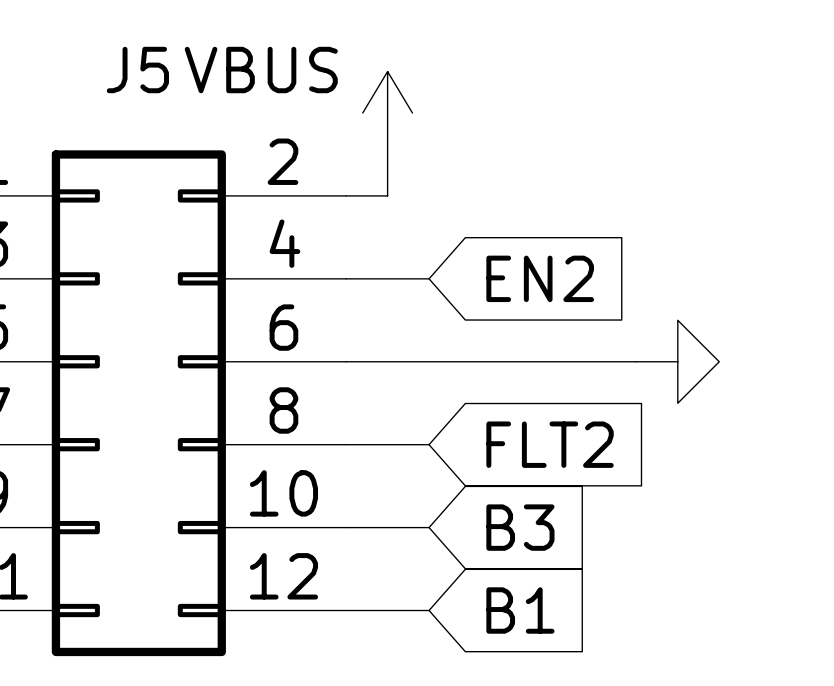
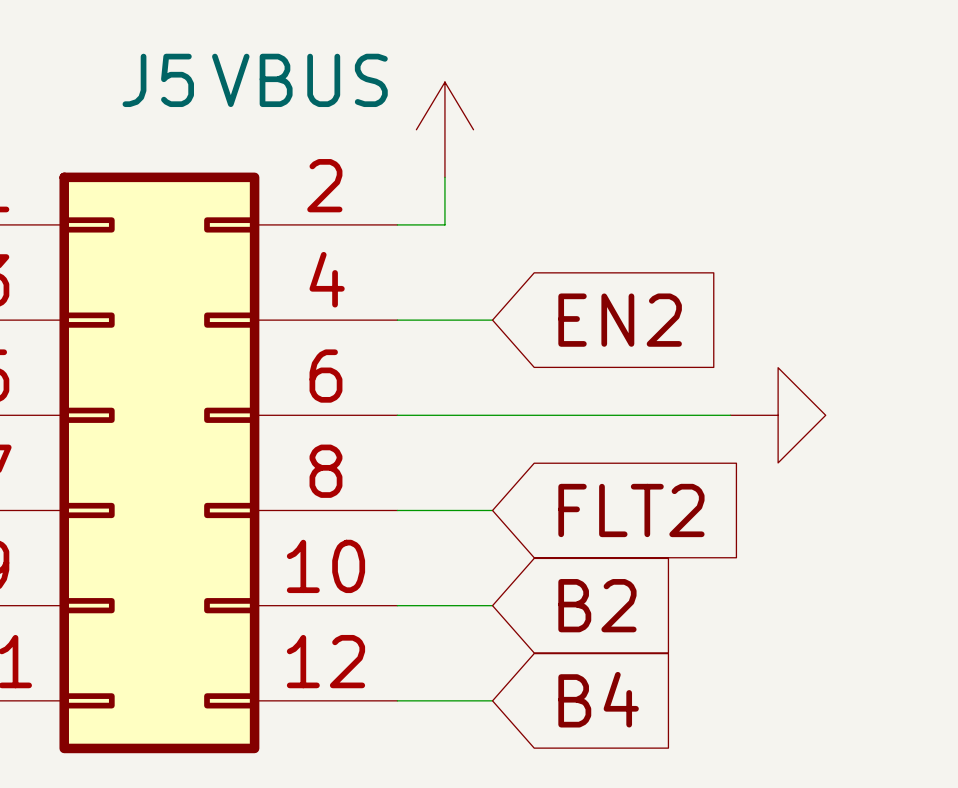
global label: B3 (520, 527) -> B2 (597, 605)
global label: B1 (520, 610) -> B4 (598, 699)

